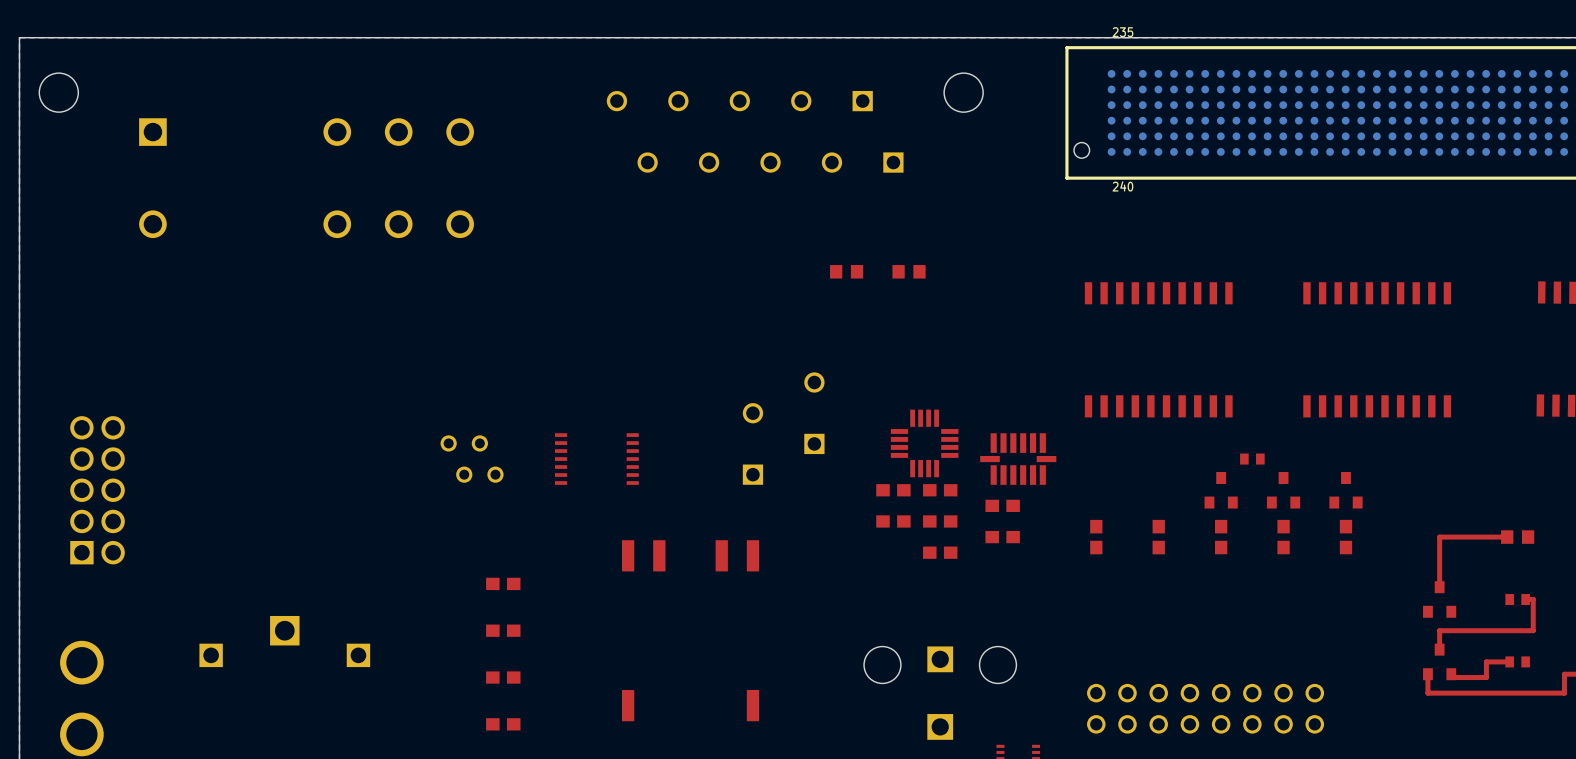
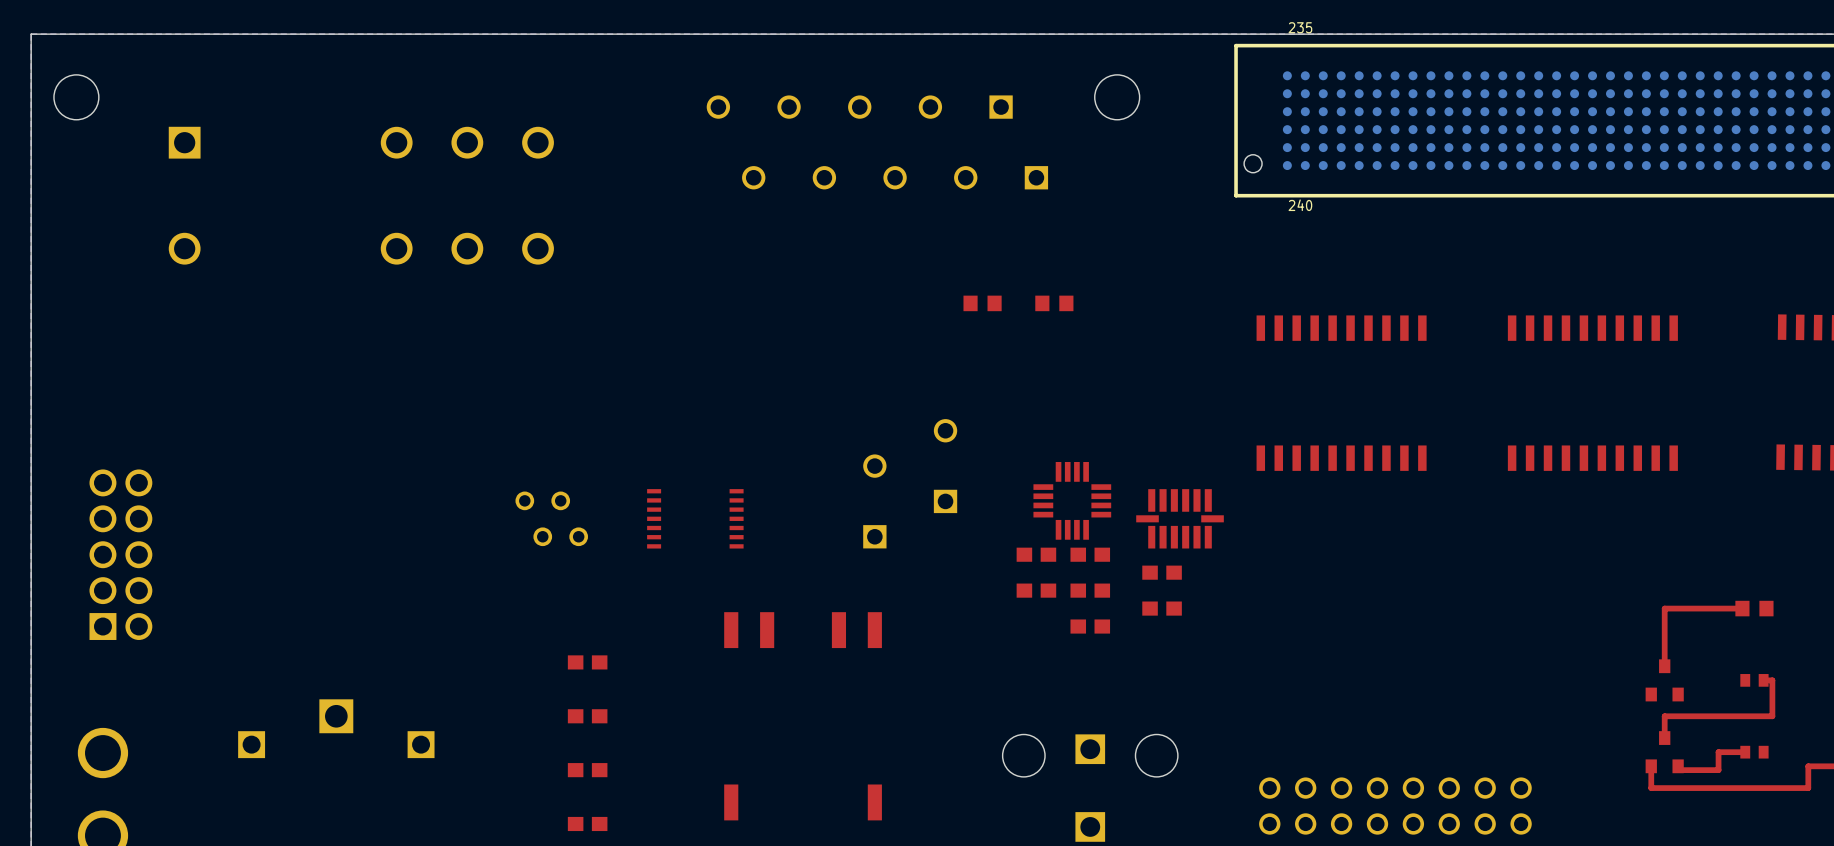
part: (1252, 459) -> none
part: (1221, 490) -> none
part: (1283, 490) -> none
part: (1345, 490) -> none
part: (1096, 537) -> none
part: (1158, 537) -> none
part: (1221, 537) -> none
part: (1283, 537) -> none
part: (1345, 537) -> none

